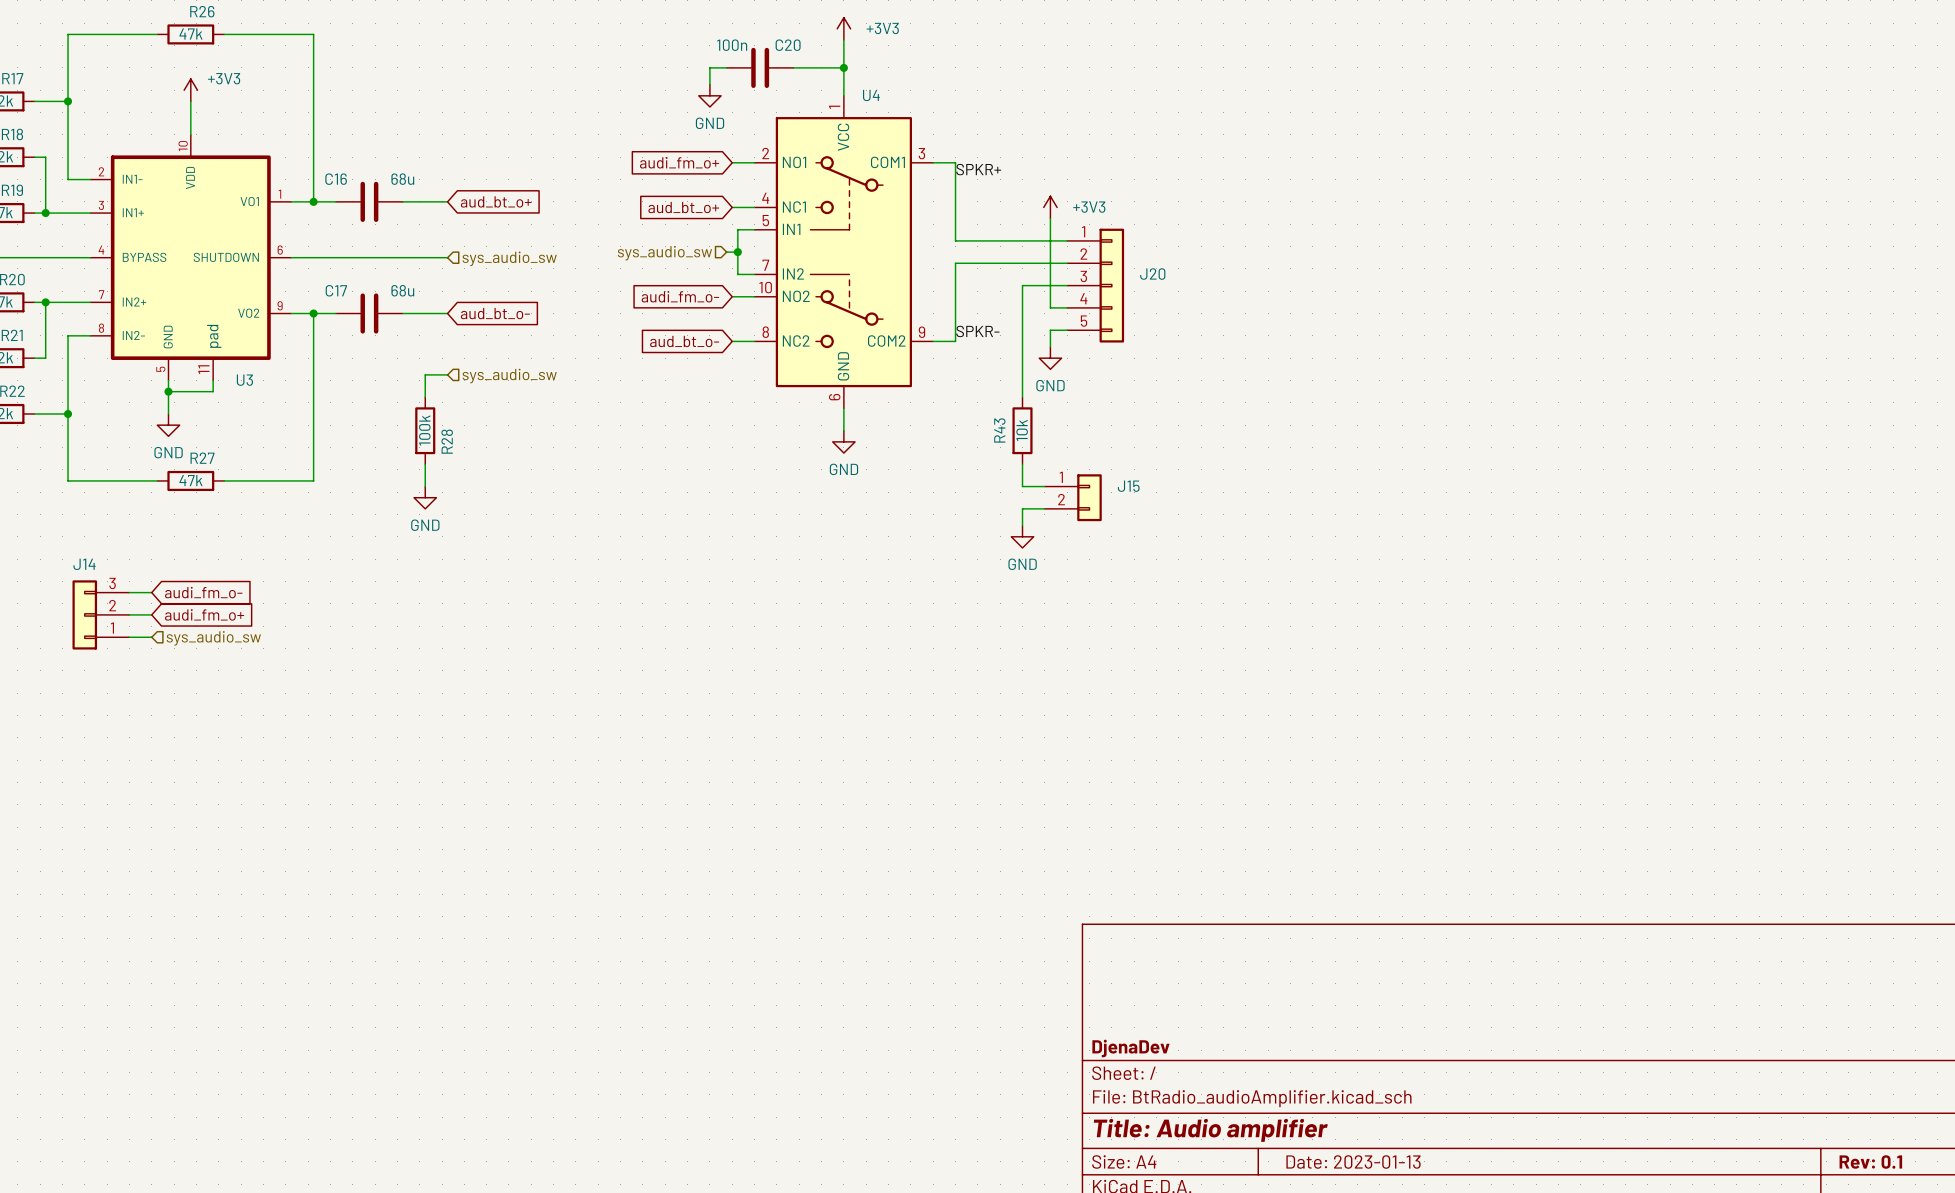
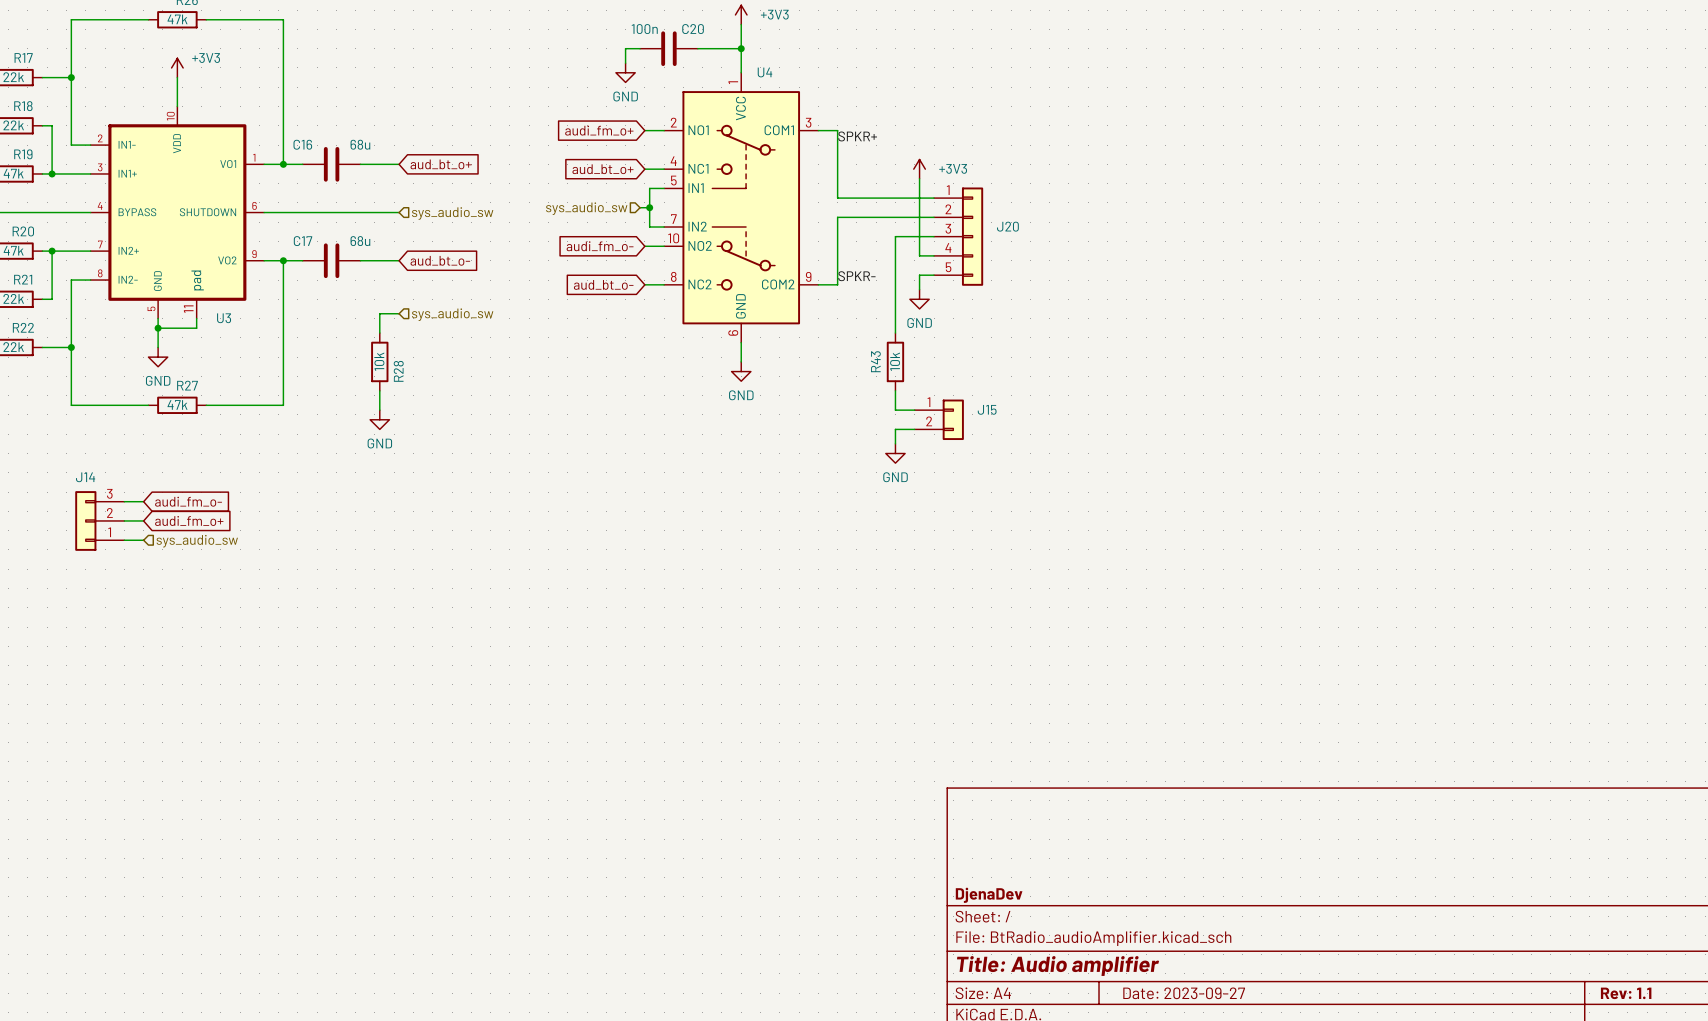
R28 value: 100k (424, 430) -> 10k (379, 361)
title block: Date: 2023-01-13 (1353, 1161) -> Date: 2023-09-27 (1184, 993)
title block: Rev: 0.1 (1870, 1162) -> Rev: 1.1 (1626, 993)

